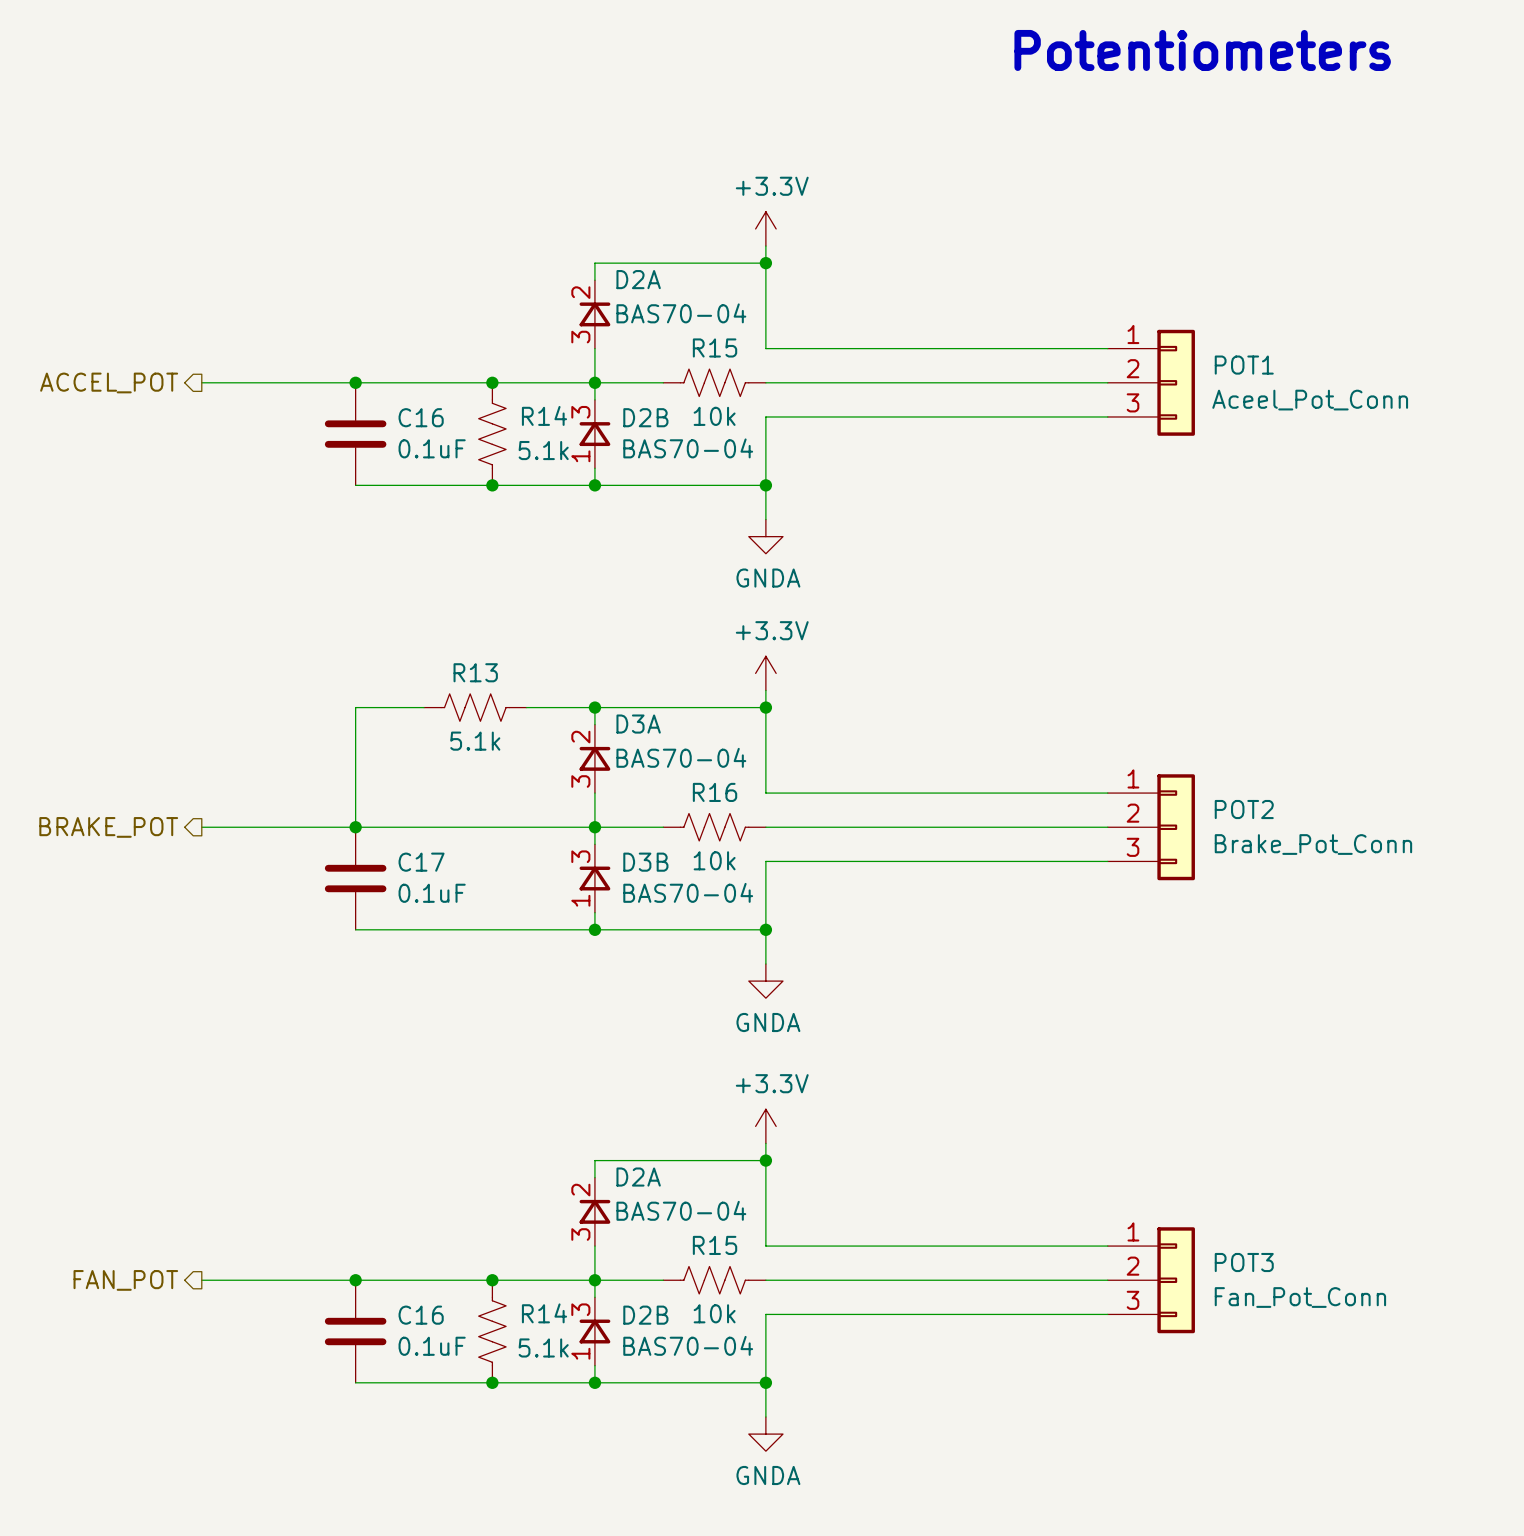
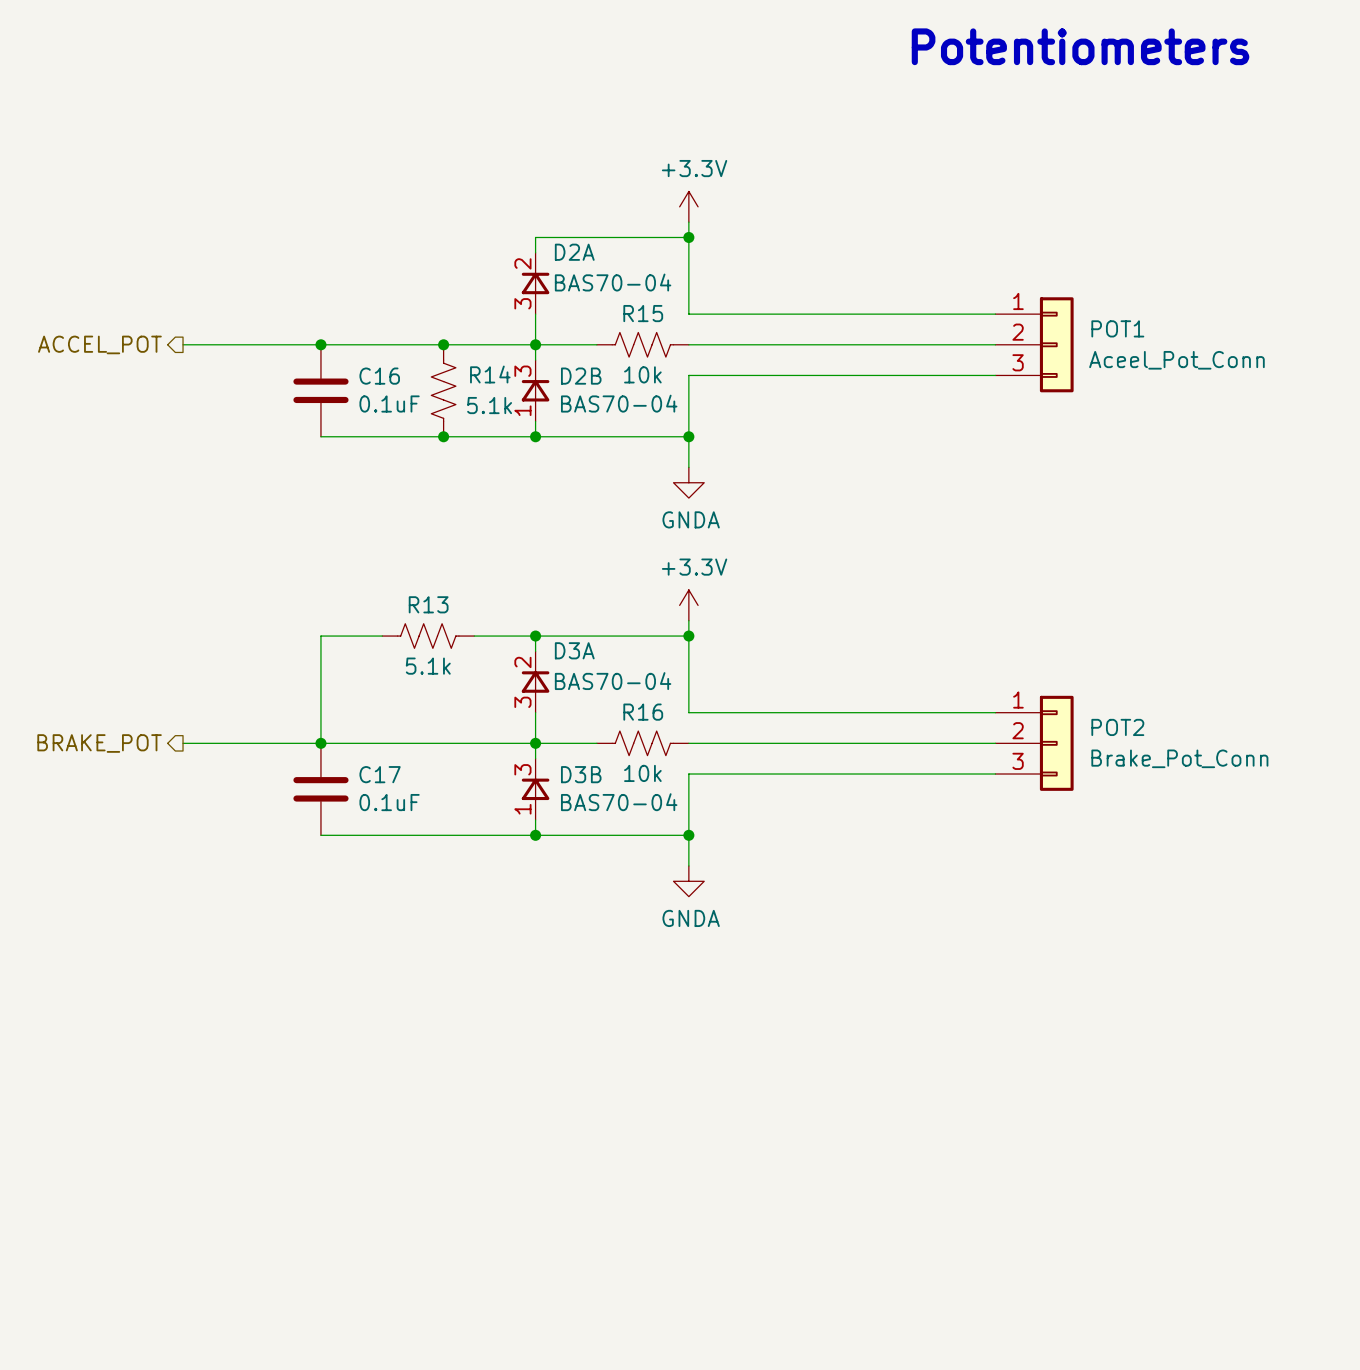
power symbol: +3.3V (765, 1126) -> none
wire: (765, 1143) (765, 1246) (1107, 1246) -> none
wire: (765, 1160) (594, 1160) (594, 1177) -> none
junction: (765, 1160) -> none
D2A: BAS70-04 (594, 1211) -> none
wire: (594, 1246) (594, 1297) -> none
hierarchical label: FAN_POT (125, 1280) -> none
wire: (201, 1280) (663, 1280) -> none
junction: (355, 1280) -> none
junction: (492, 1280) -> none
junction: (594, 1280) -> none
R15: 10k (714, 1280) -> none
wire: (765, 1280) (1107, 1280) -> none
POT3: Fan_Pot_Conn (1151, 1280) -> none
wire: (1107, 1314) (765, 1314) (765, 1416) -> none
C16: 0.1uF (355, 1331) -> none
R14: 5.1k (492, 1331) -> none
D2B: BAS70-04 (594, 1331) -> none
wire: (594, 1365) (594, 1382) -> none
wire: (355, 1382) (765, 1382) -> none
junction: (492, 1382) -> none
junction: (594, 1382) -> none
junction: (765, 1382) -> none
power symbol: GNDA (765, 1434) -> none

